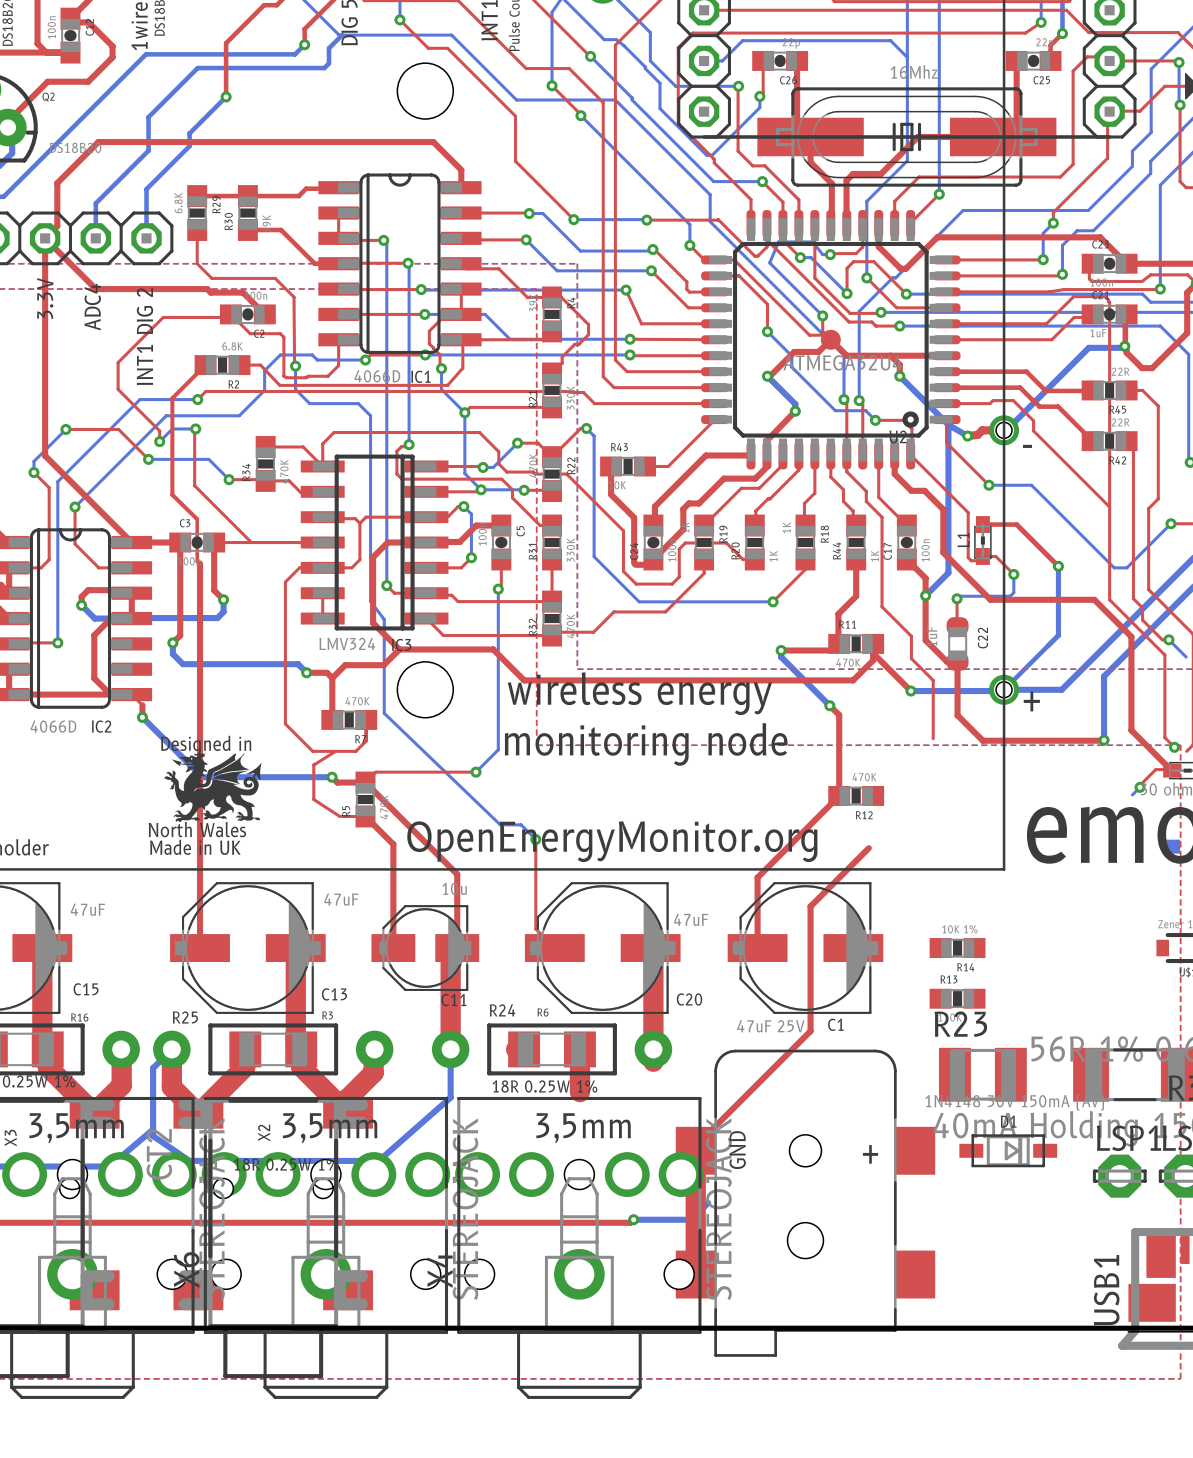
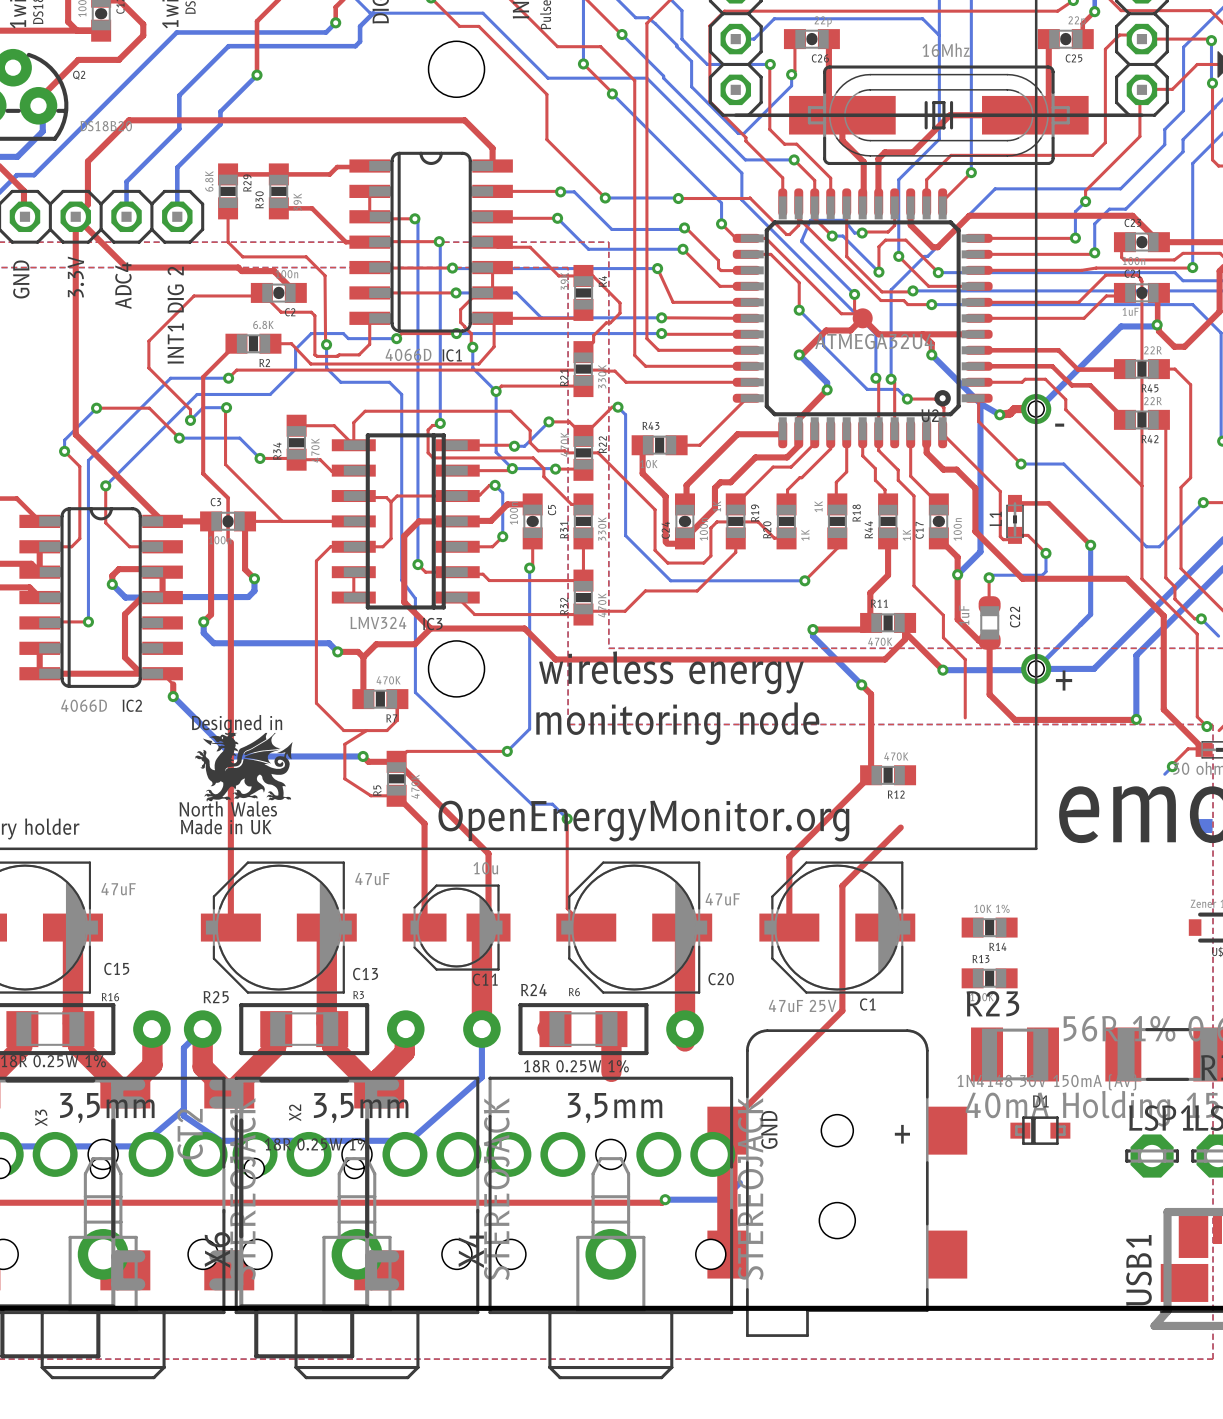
D1 footprint: [959, 1134, 1058, 1168] -> [1010, 1116, 1071, 1145]

